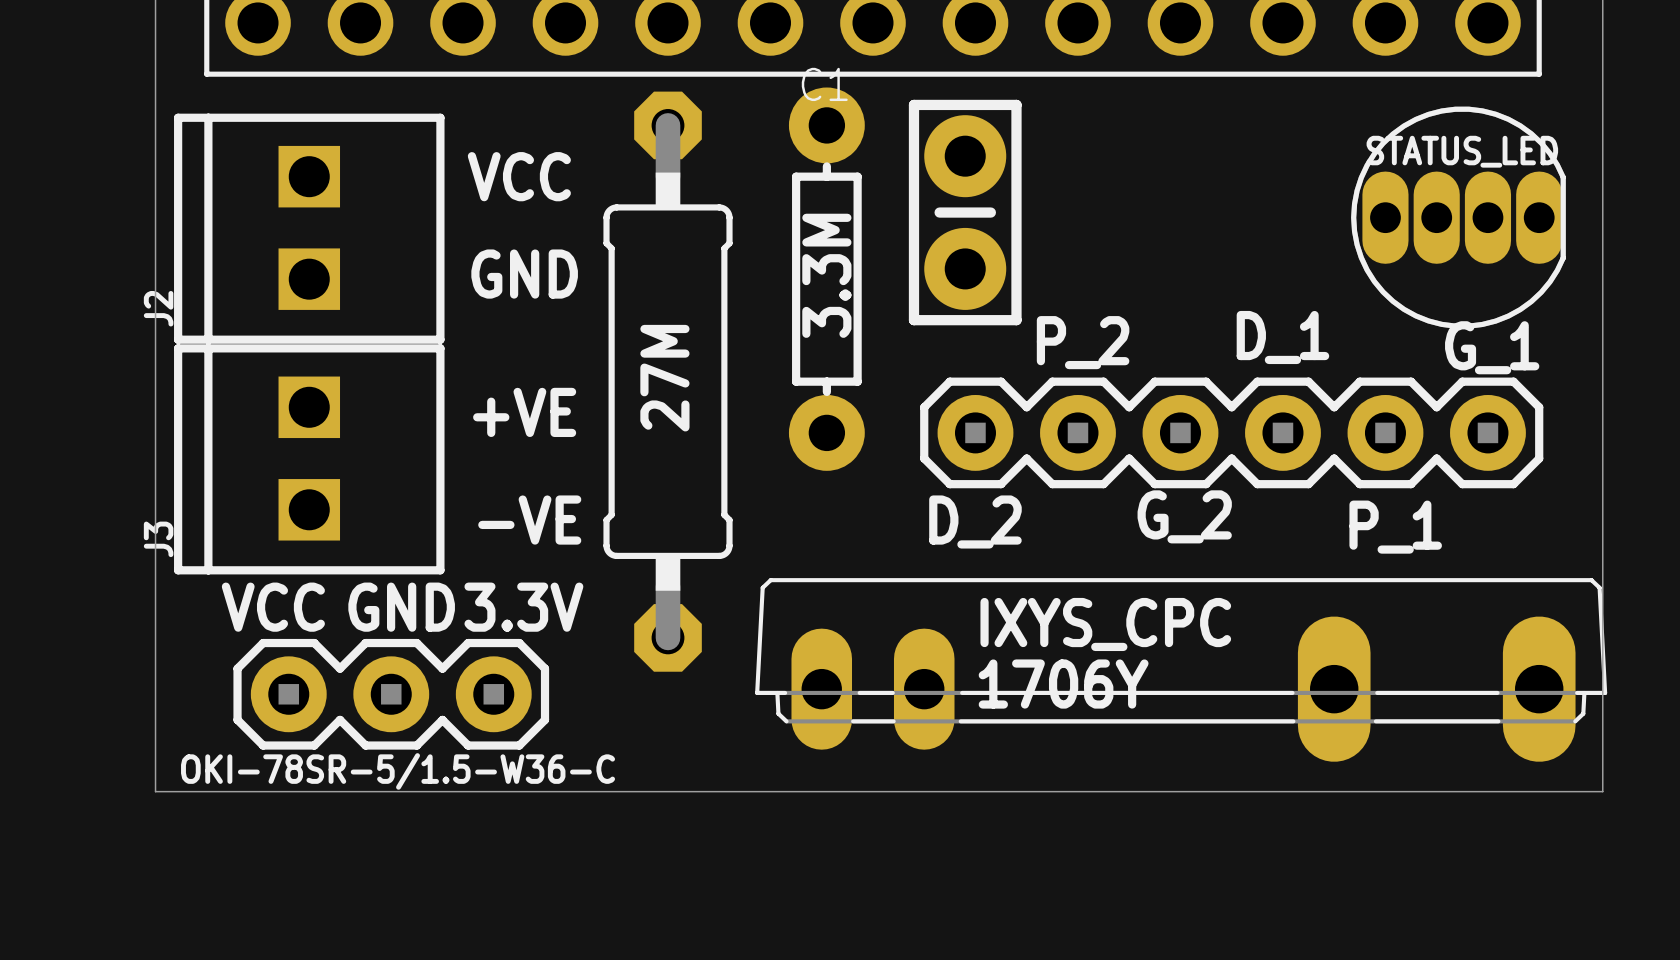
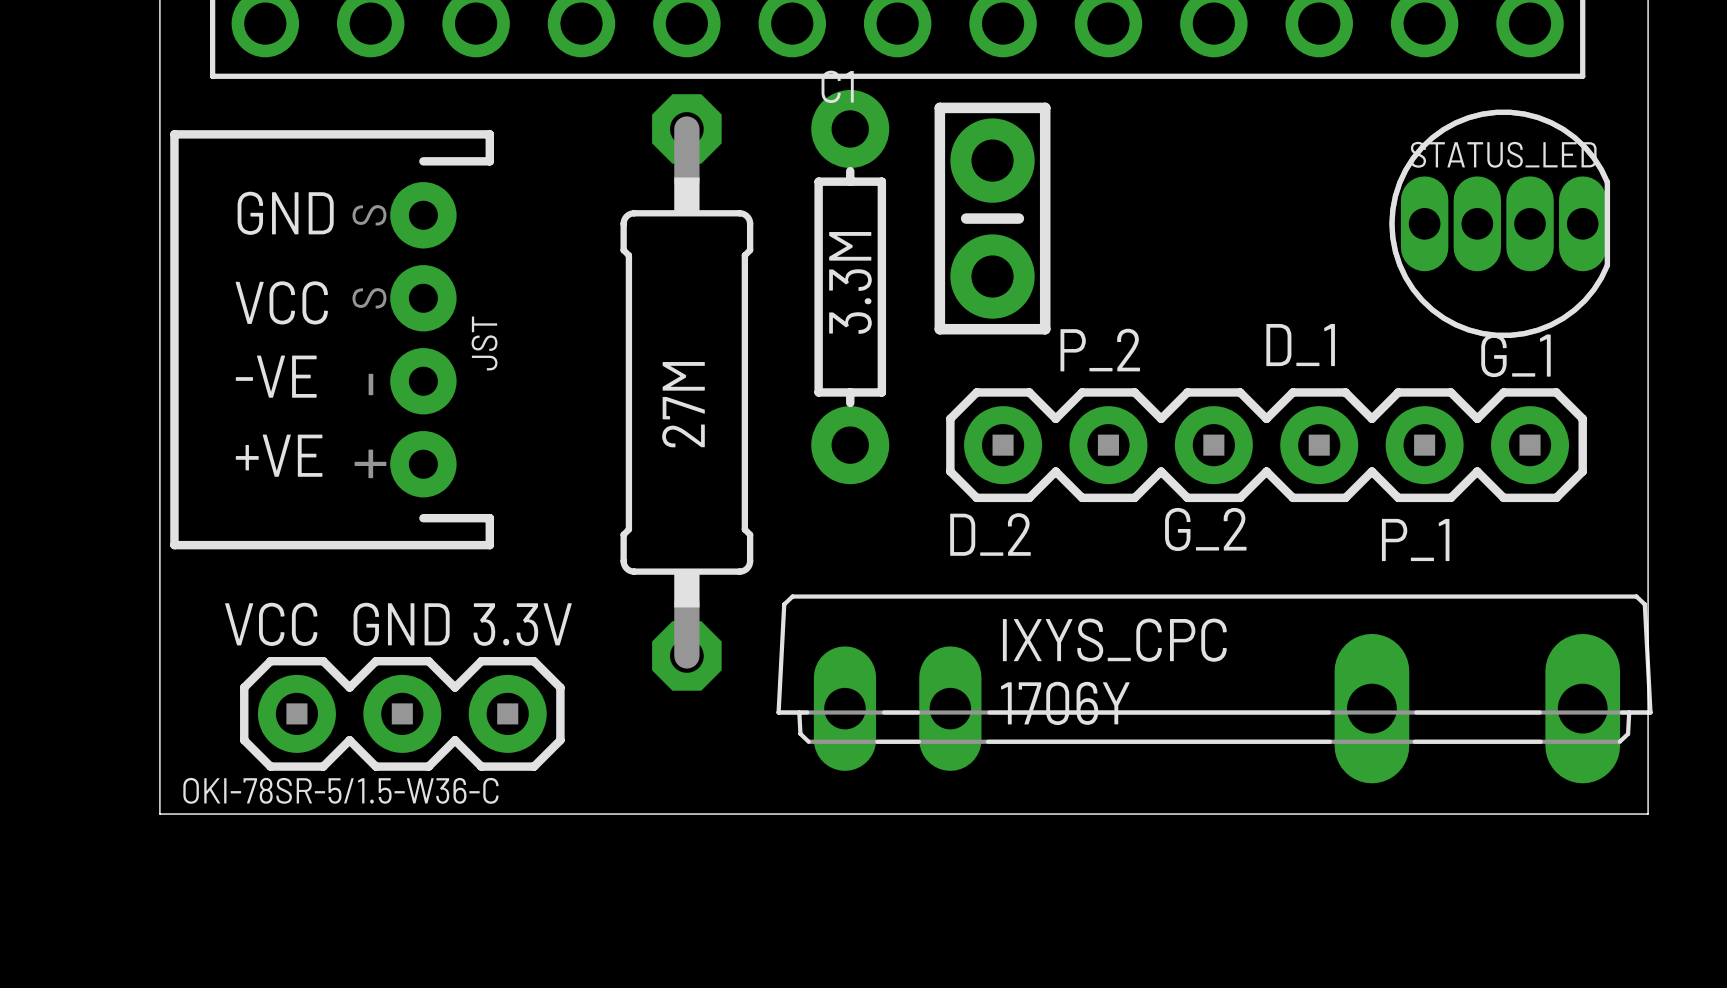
text position: VCC (519, 176) -> VCC (281, 302)
J2: (309, 228) -> none
text position: GND (524, 274) -> GND (285, 213)
JST: none -> (332, 339)
text position: +VE (524, 412) -> +VE (279, 455)
J3: (309, 459) -> none
text position: -VE (529, 520) -> -VE (276, 376)

